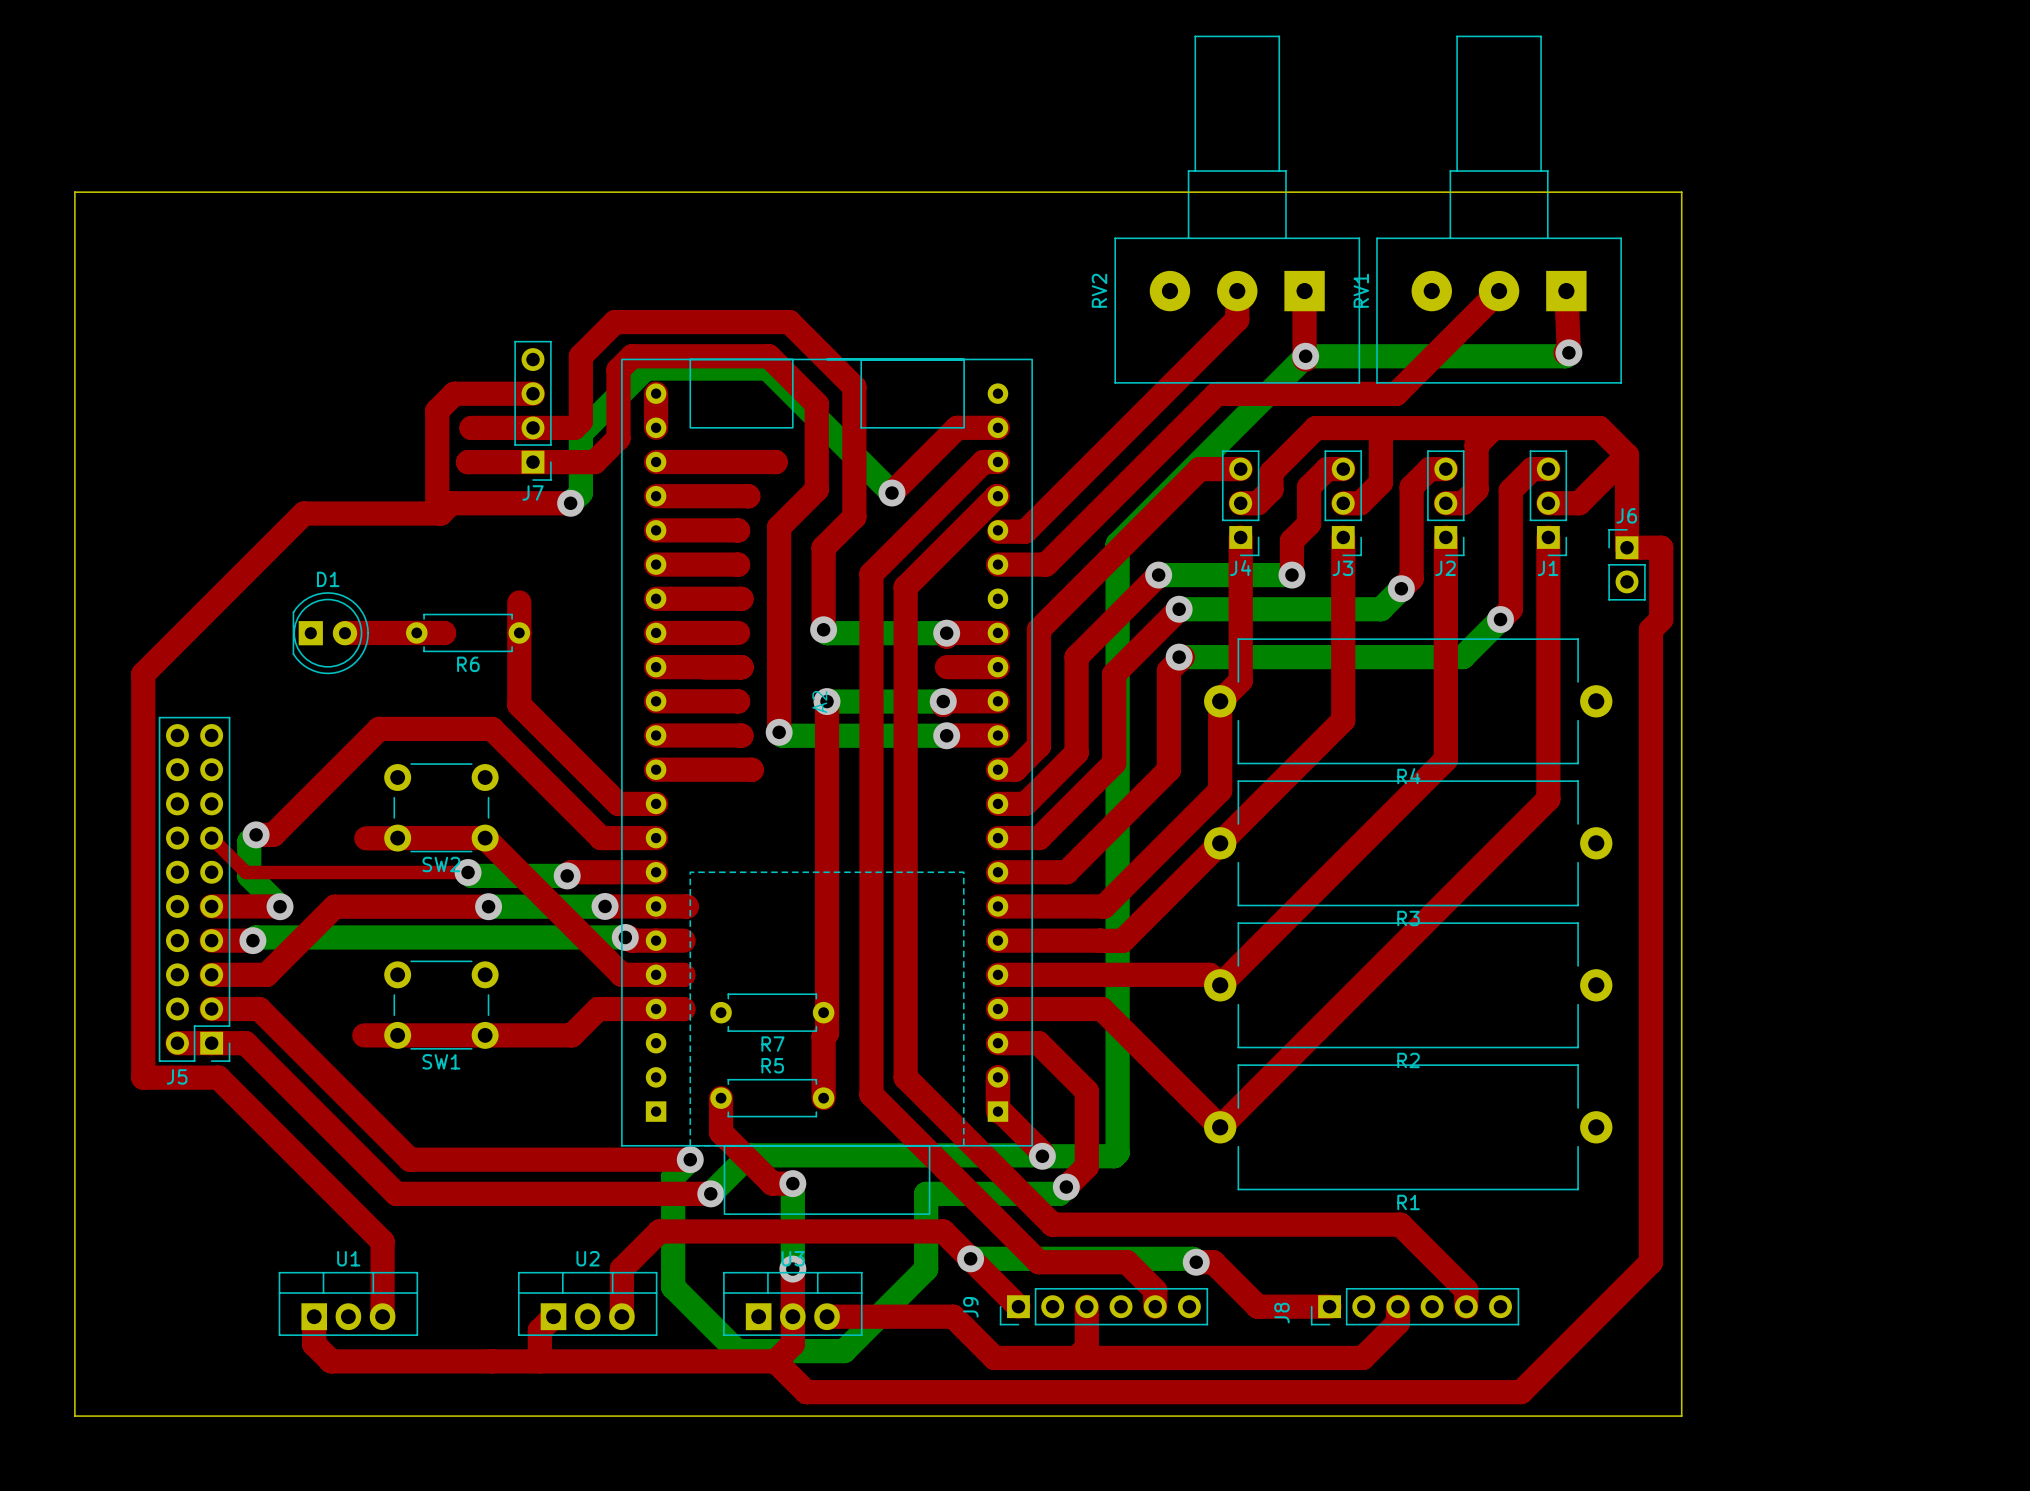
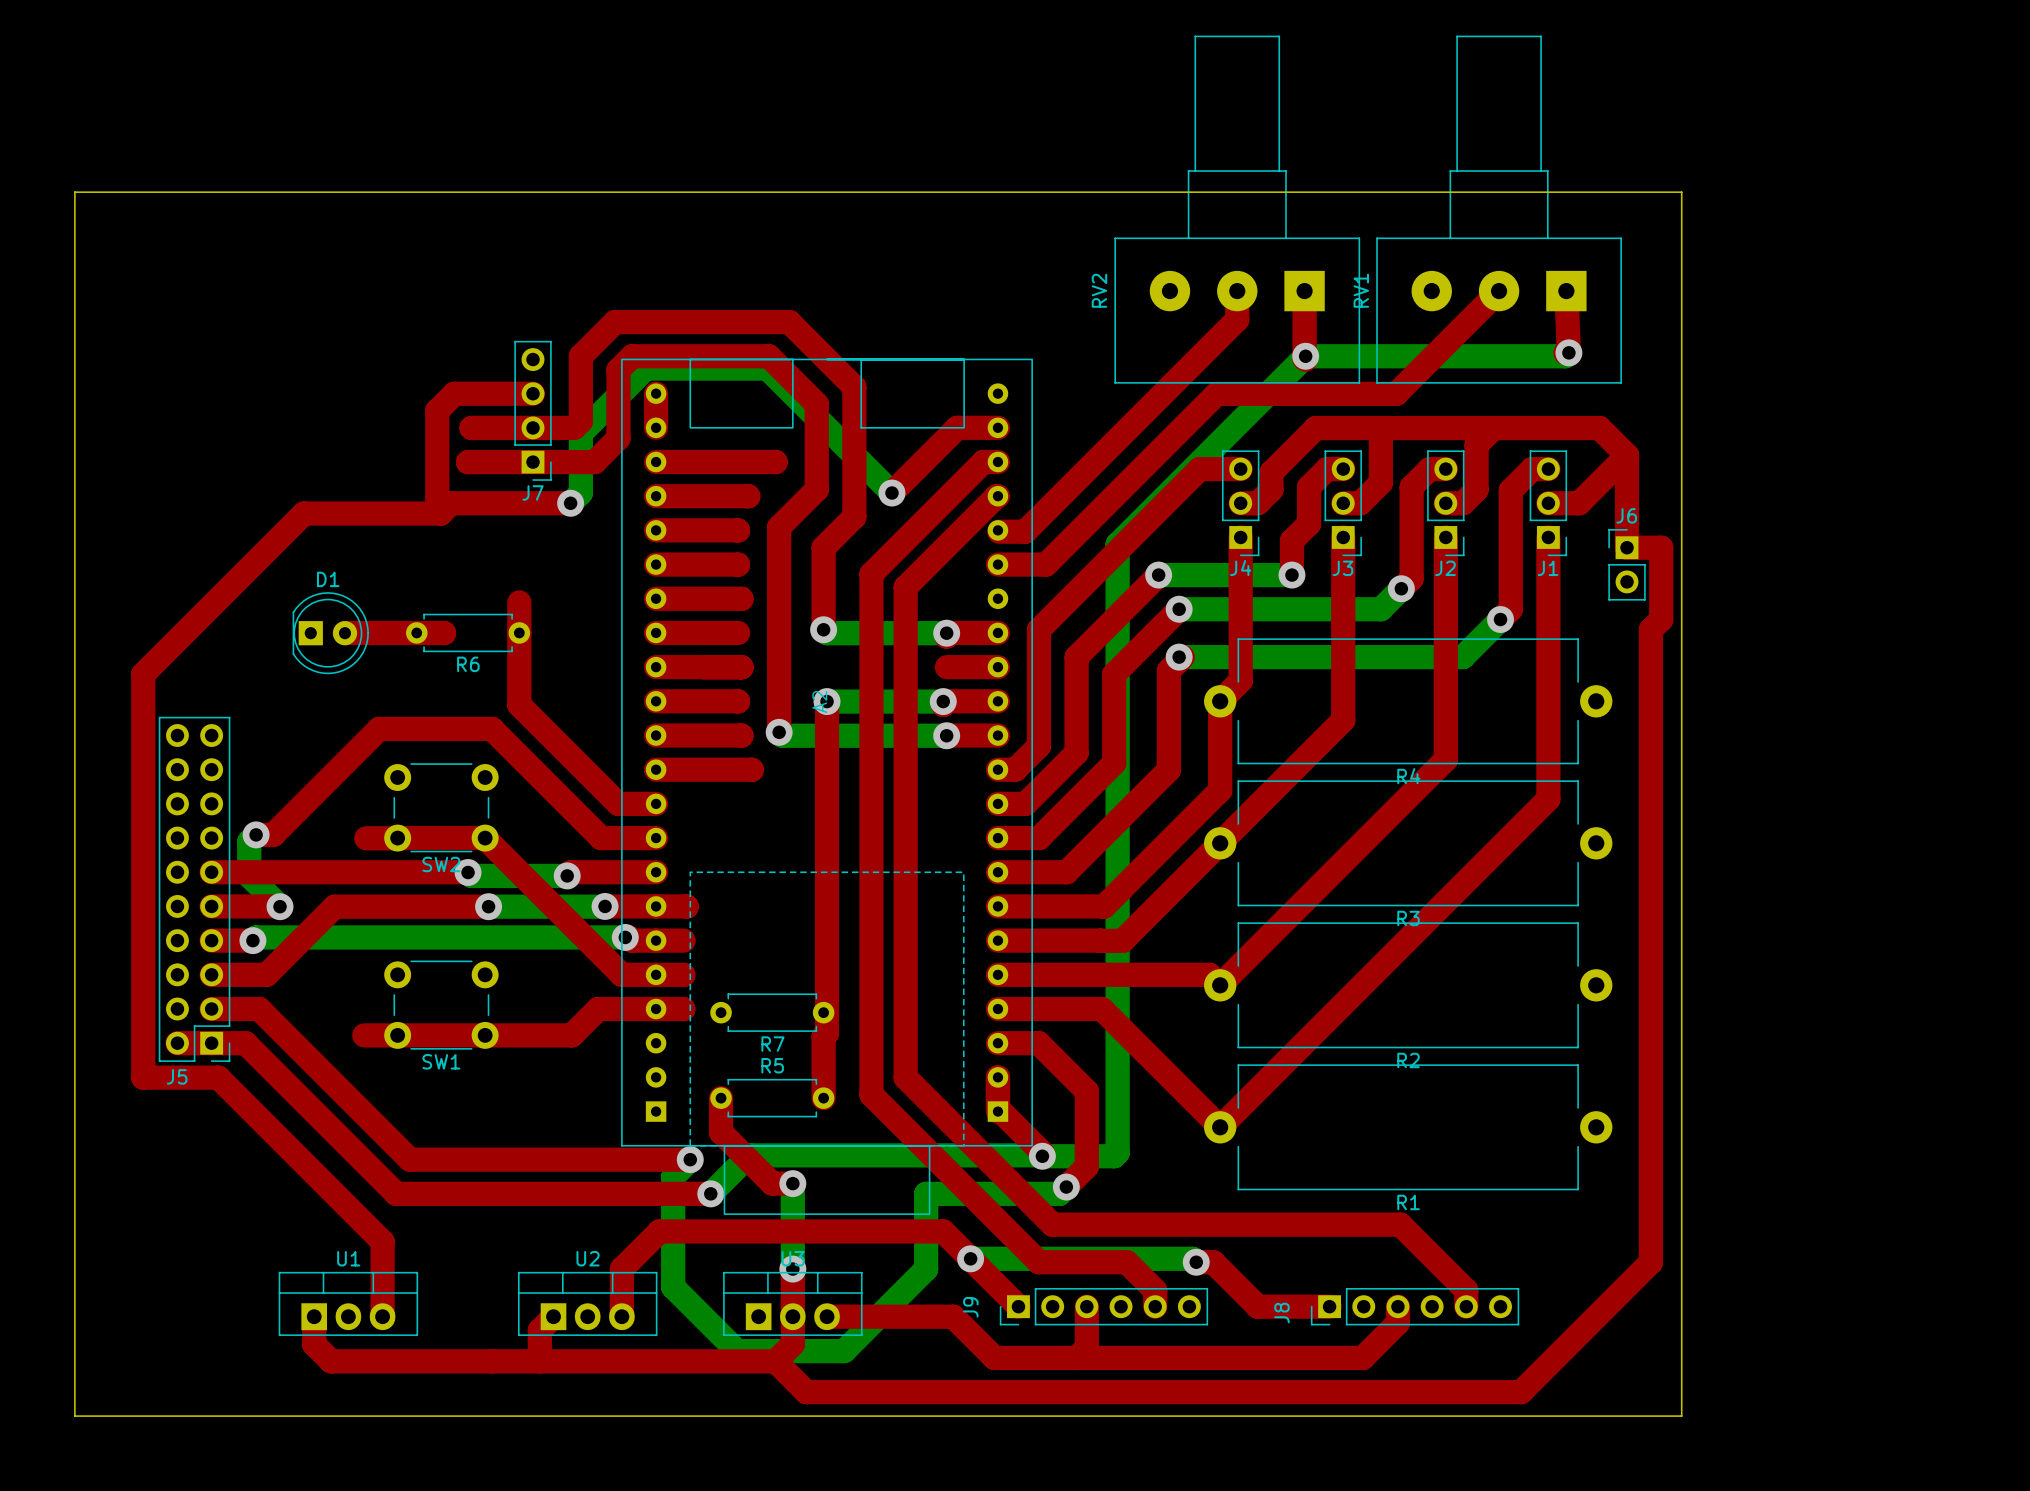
top track: (211, 838) (246, 872) (468, 872) -> (211, 872) (467, 872)

